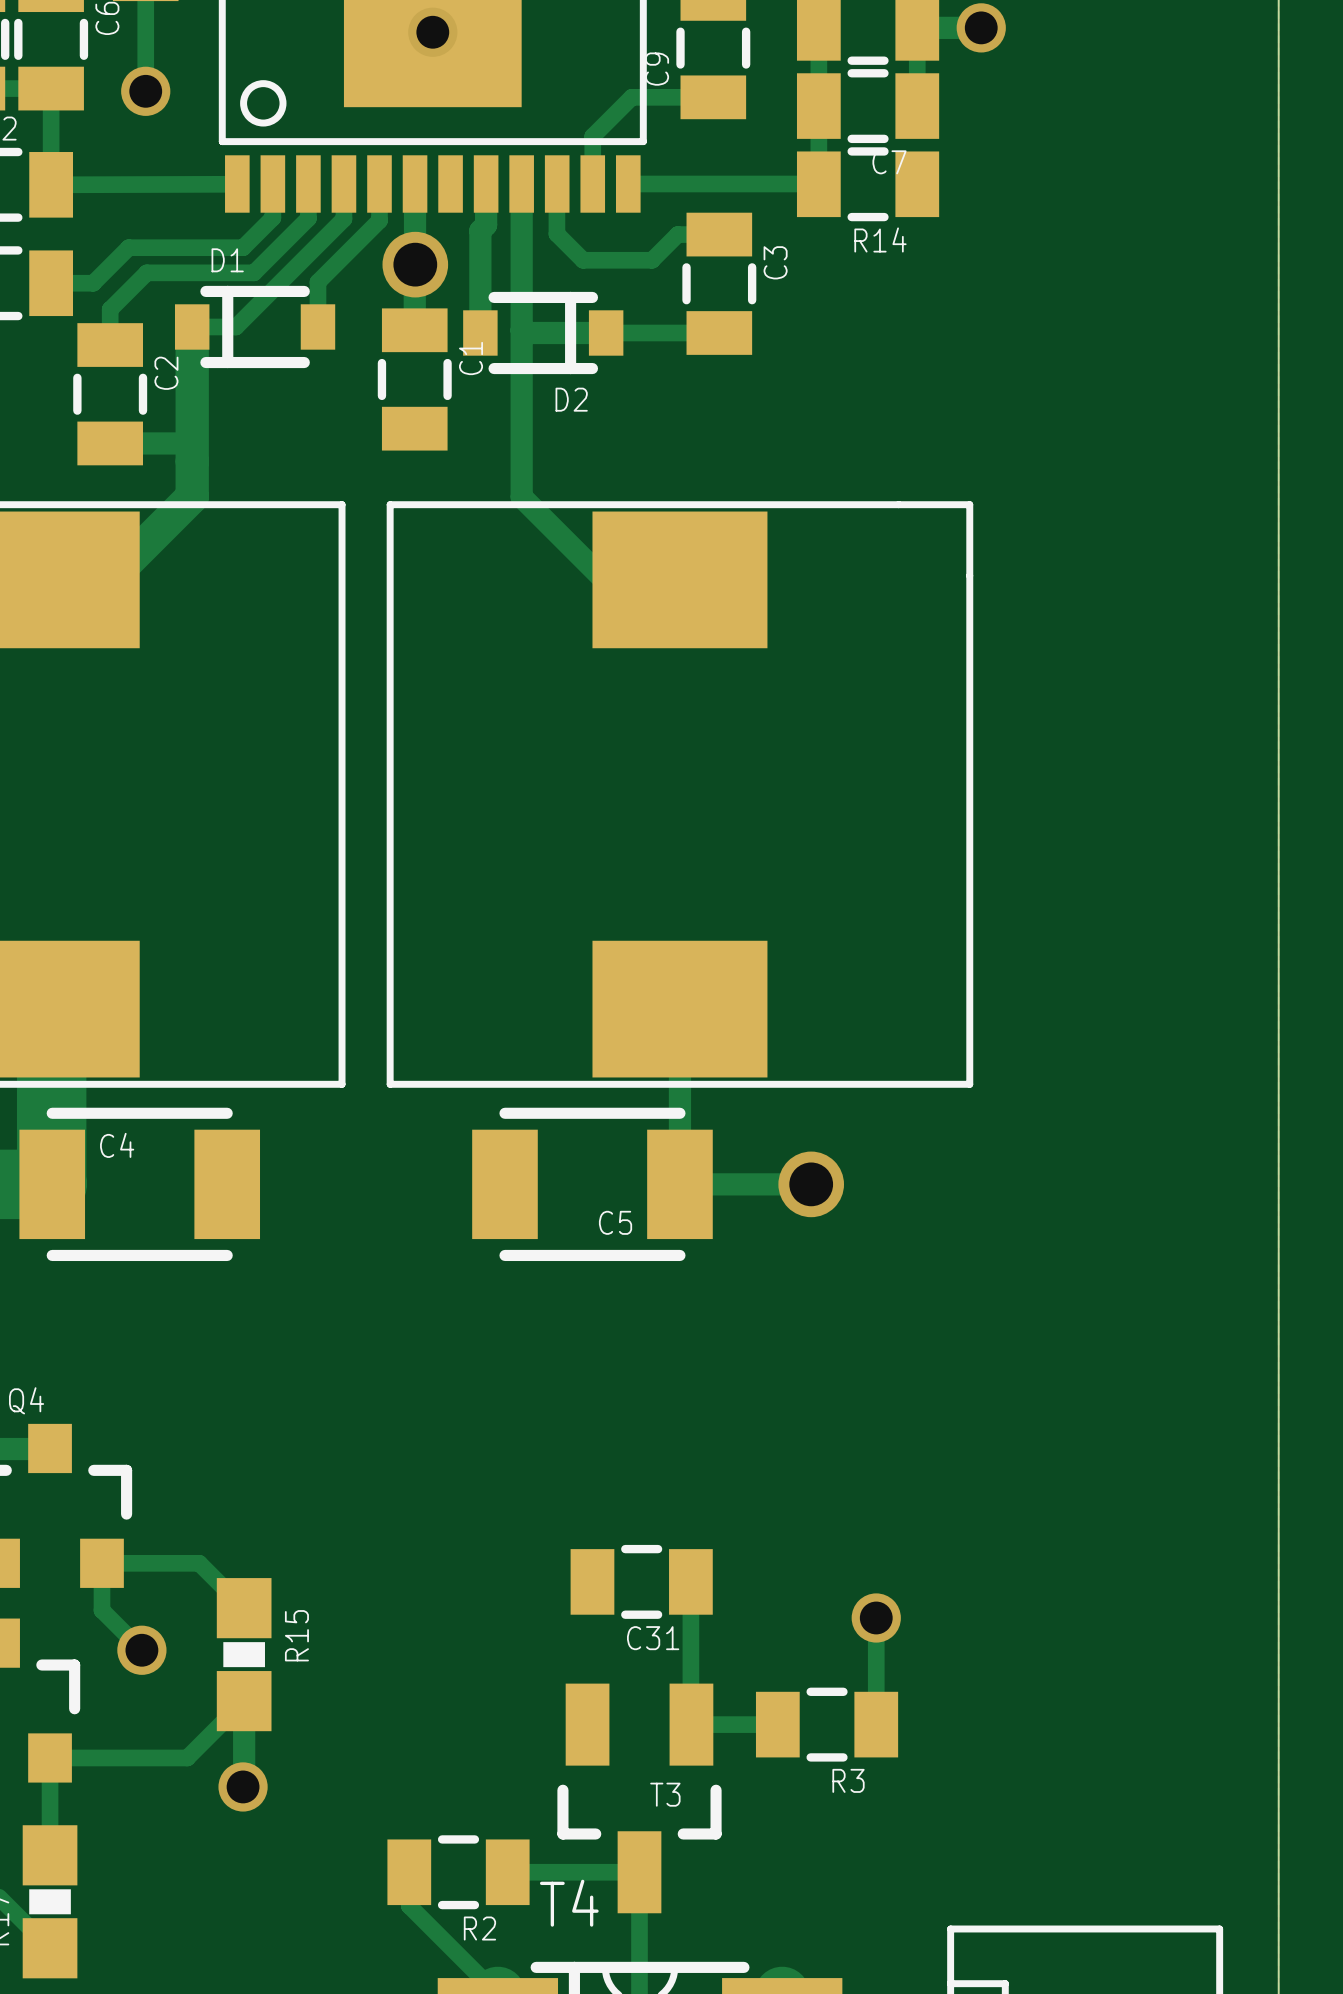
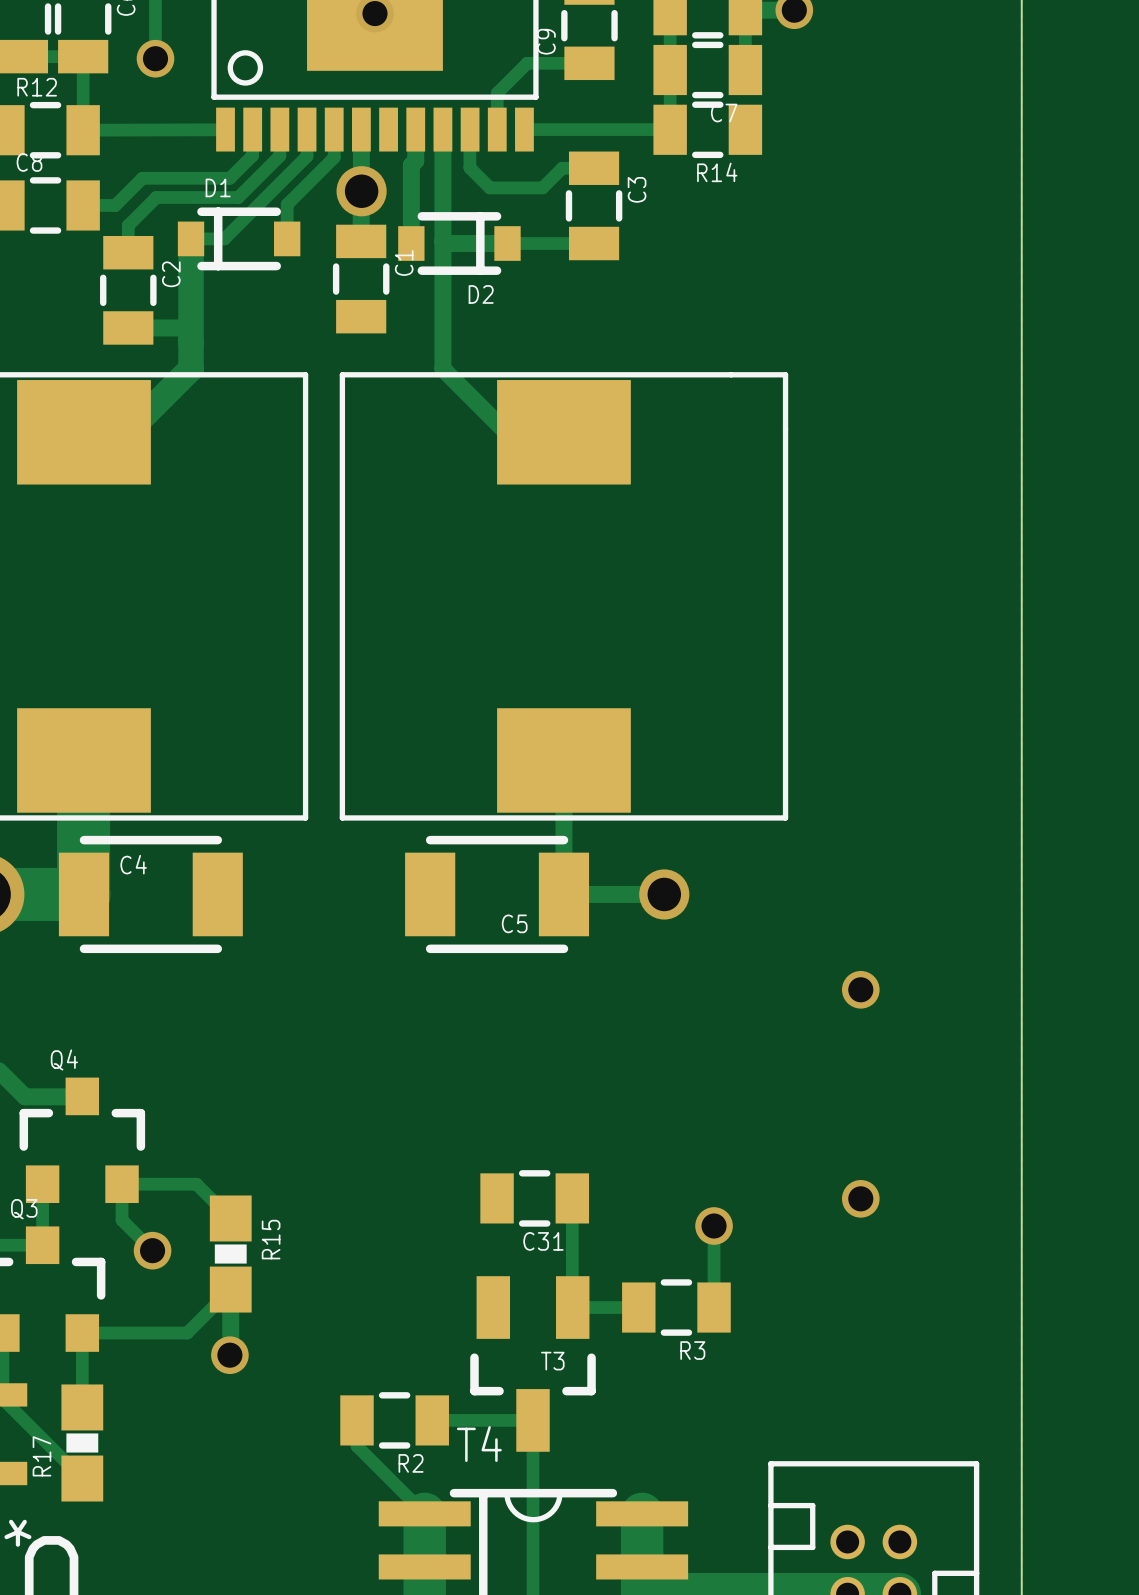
via: none -> (860, 989)
via: none -> (860, 1198)

